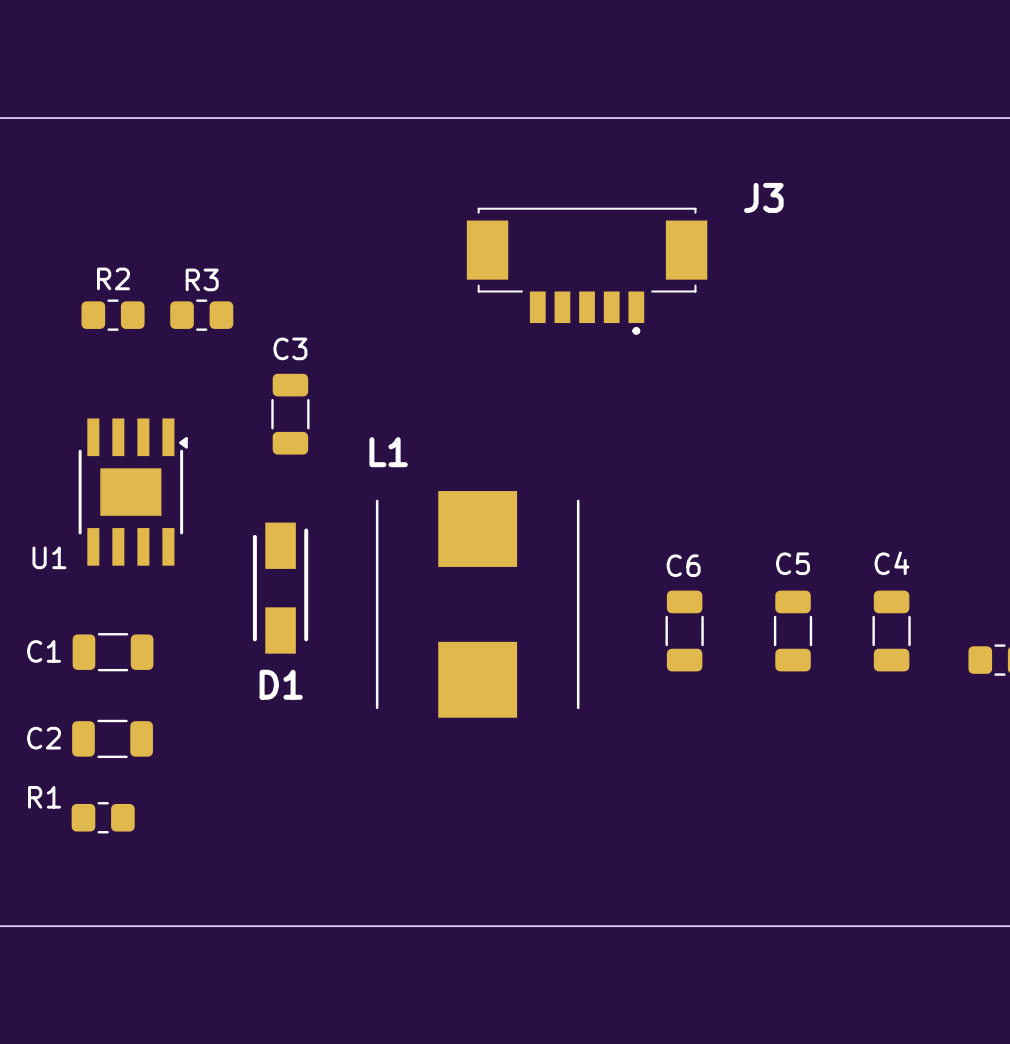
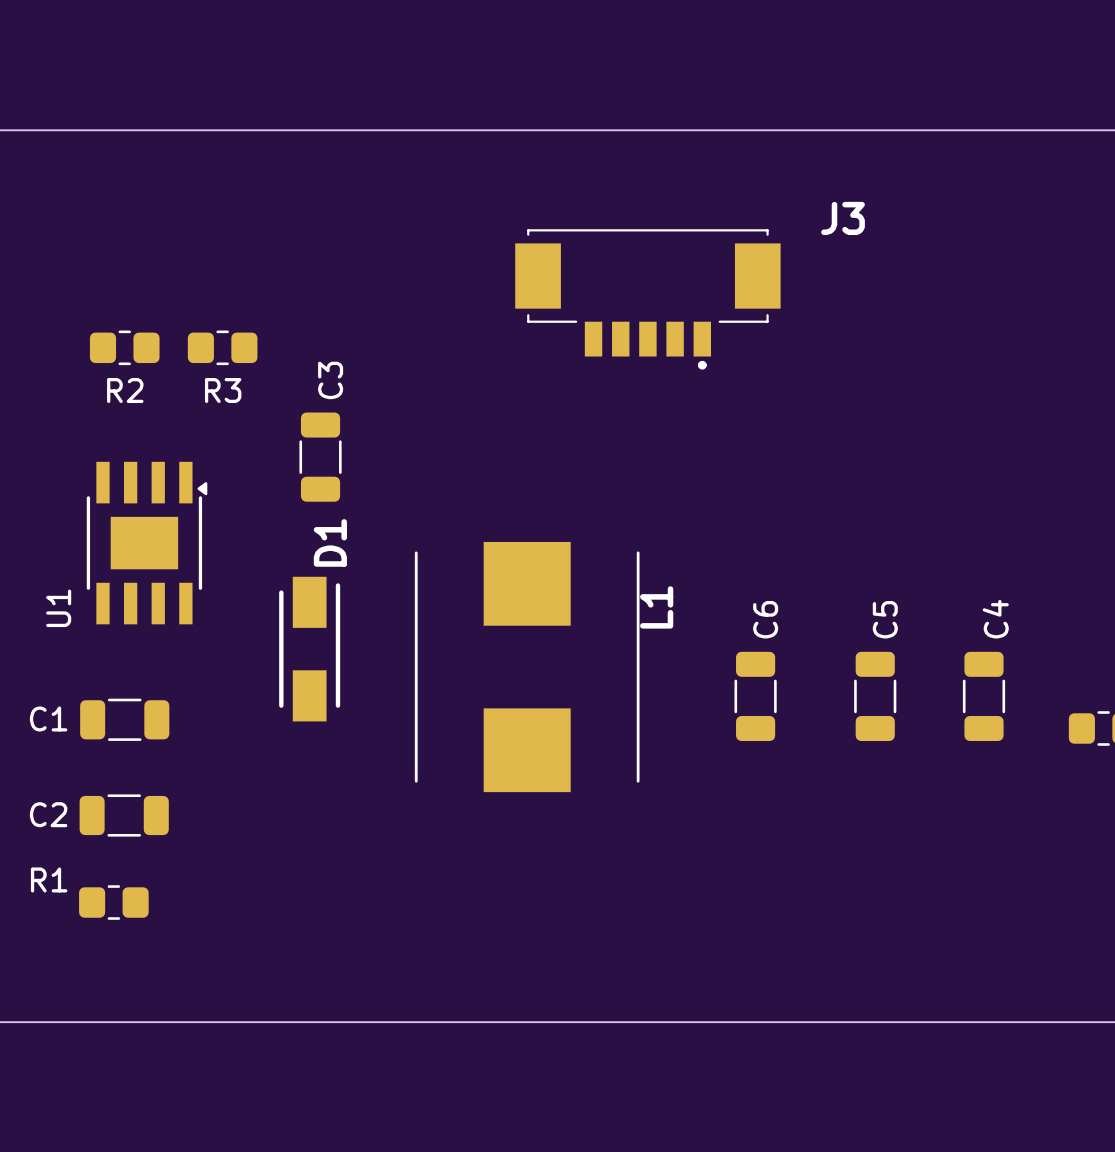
R2 name position: R2 (113, 278) -> R2 (125, 390)
R3 name position: R3 (202, 279) -> R3 (223, 390)
C3 name rotation: 0° (290, 348) -> 90° counterclockwise (330, 380)
L1 name rotation: 0° (388, 452) -> 90° counterclockwise (656, 607)
L1 name position: L1 (388, 452) -> L1 (656, 607)
U1 name rotation: 0° (49, 557) -> 90° counterclockwise (58, 608)
C5 name rotation: 0° (793, 563) -> 90° counterclockwise (885, 619)
C4 name rotation: 0° (892, 563) -> 90° counterclockwise (995, 619)
C6 name rotation: 0° (683, 565) -> 90° counterclockwise (765, 619)
D1 name rotation: 0° (281, 684) -> 90° counterclockwise (330, 542)
D1 name position: D1 (281, 684) -> D1 (330, 542)

